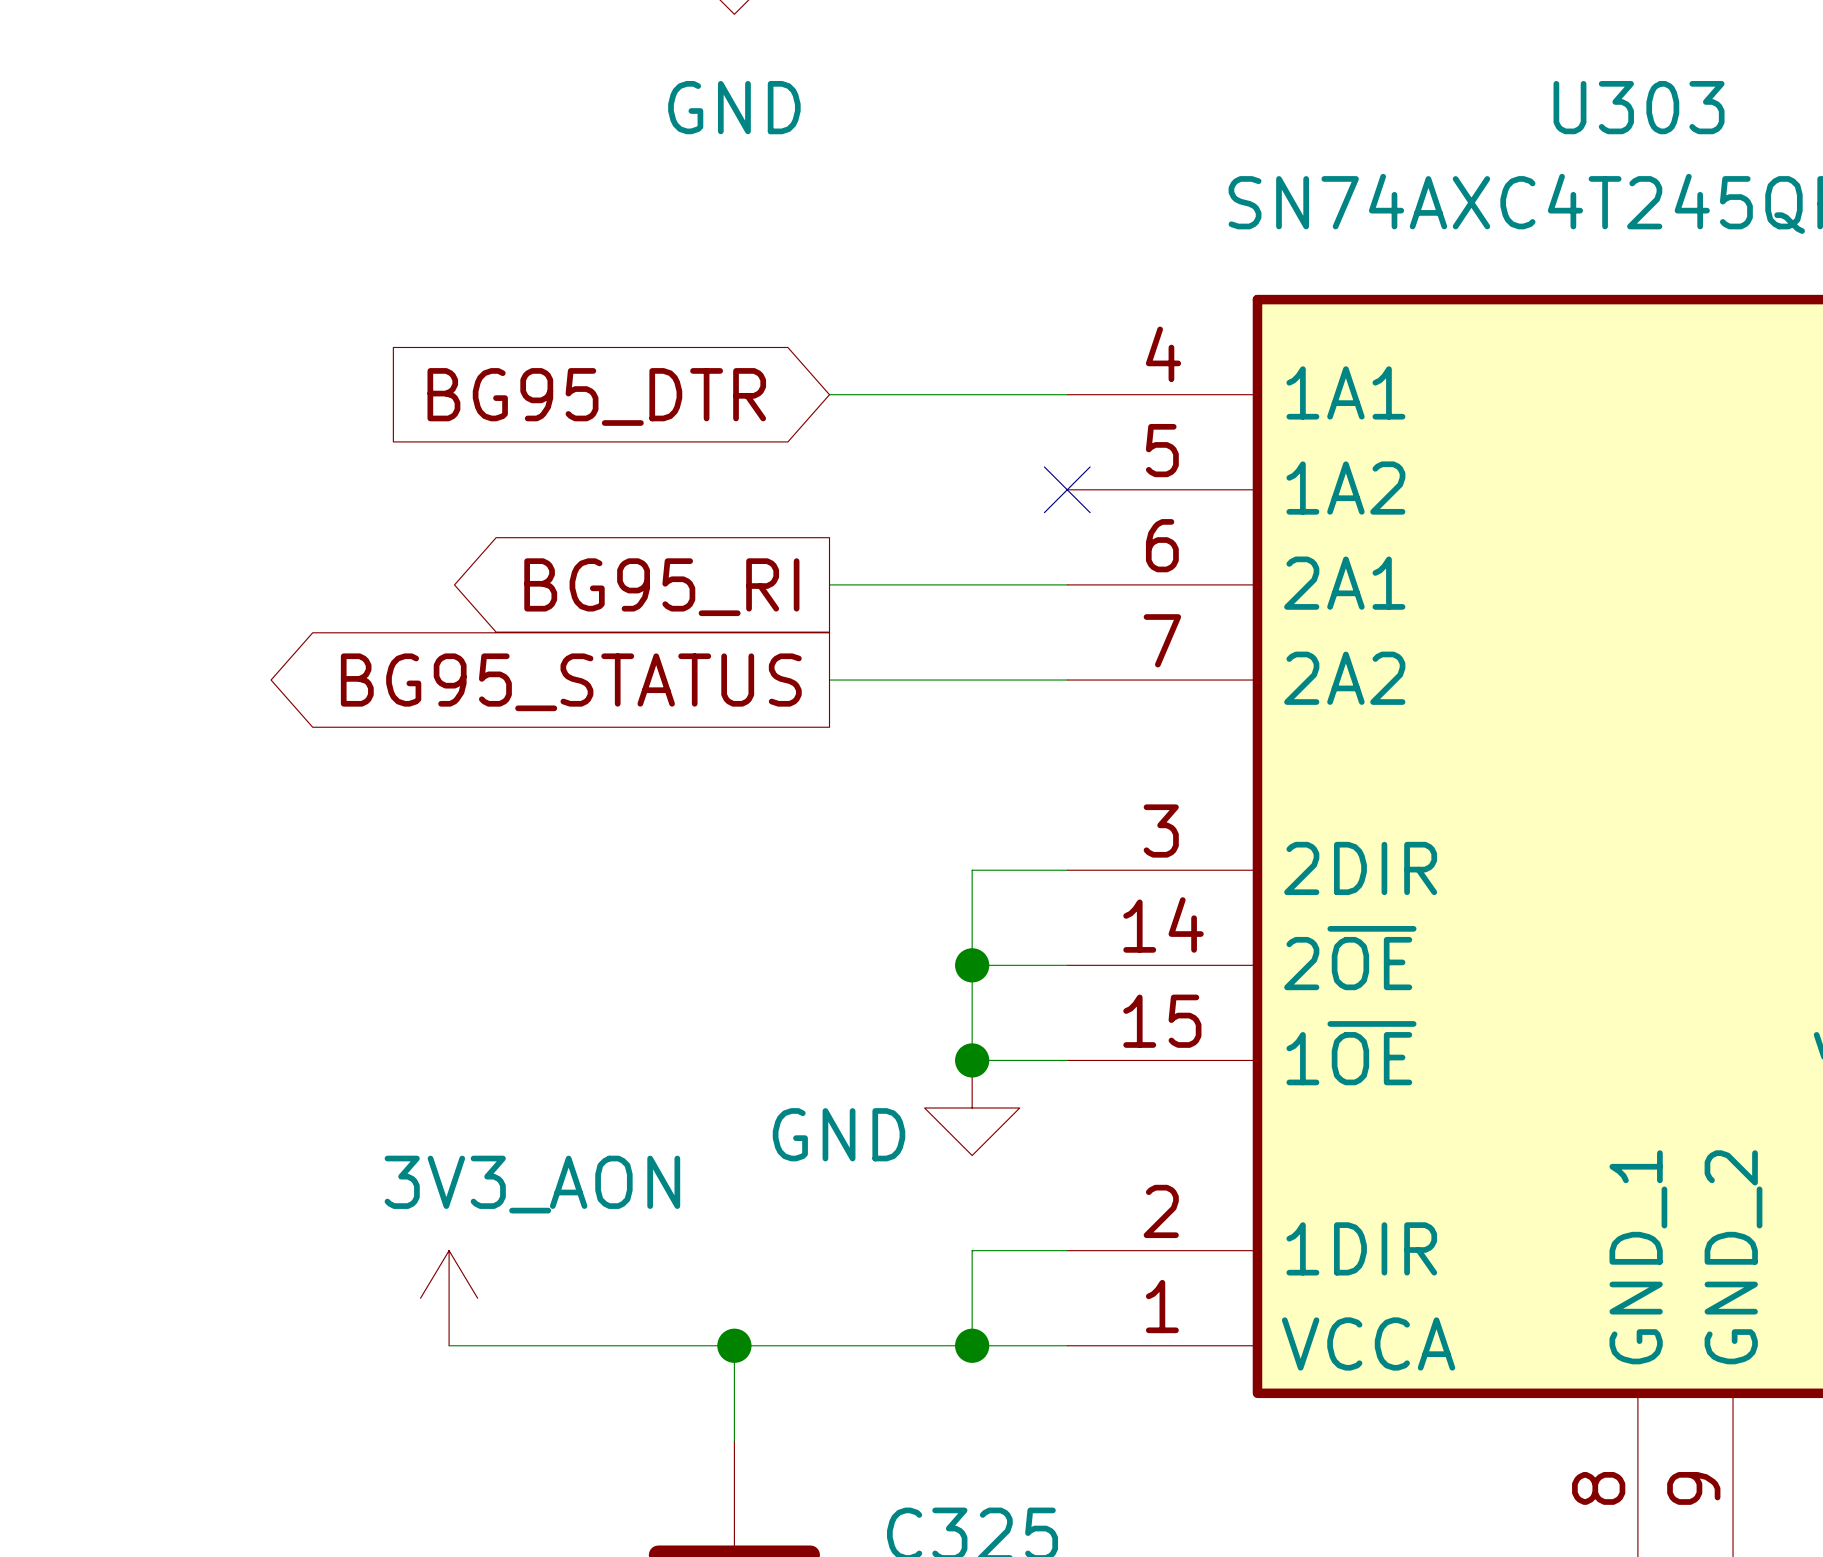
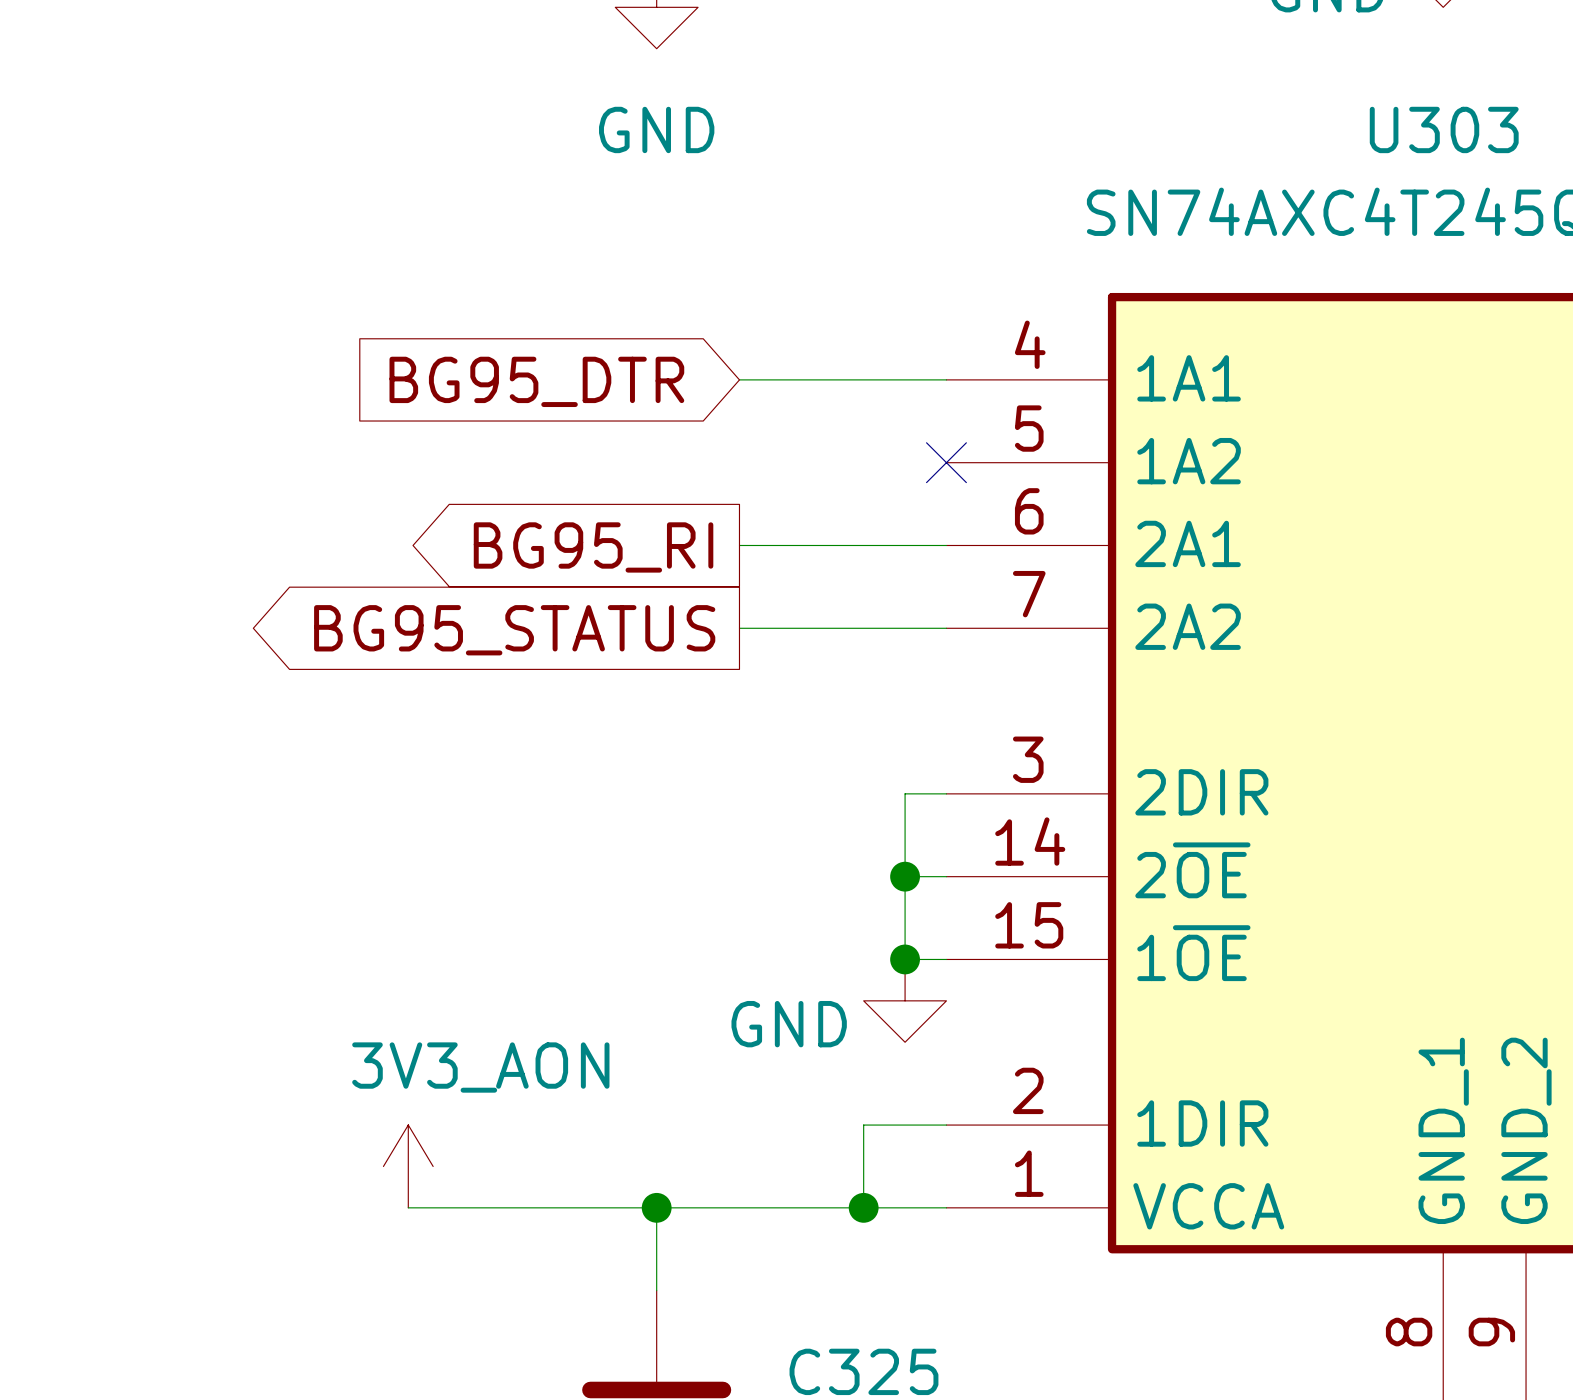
wire: (1019, 870) (972, 870) (972, 1060) (1019, 1060) -> (905, 793) (905, 959)
wire: (972, 965) (1019, 965) -> none
junction position: (972, 965) -> (905, 876)
junction position: (972, 1060) -> (905, 959)
power symbol position: GND (972, 1108) -> GND (905, 1000)

